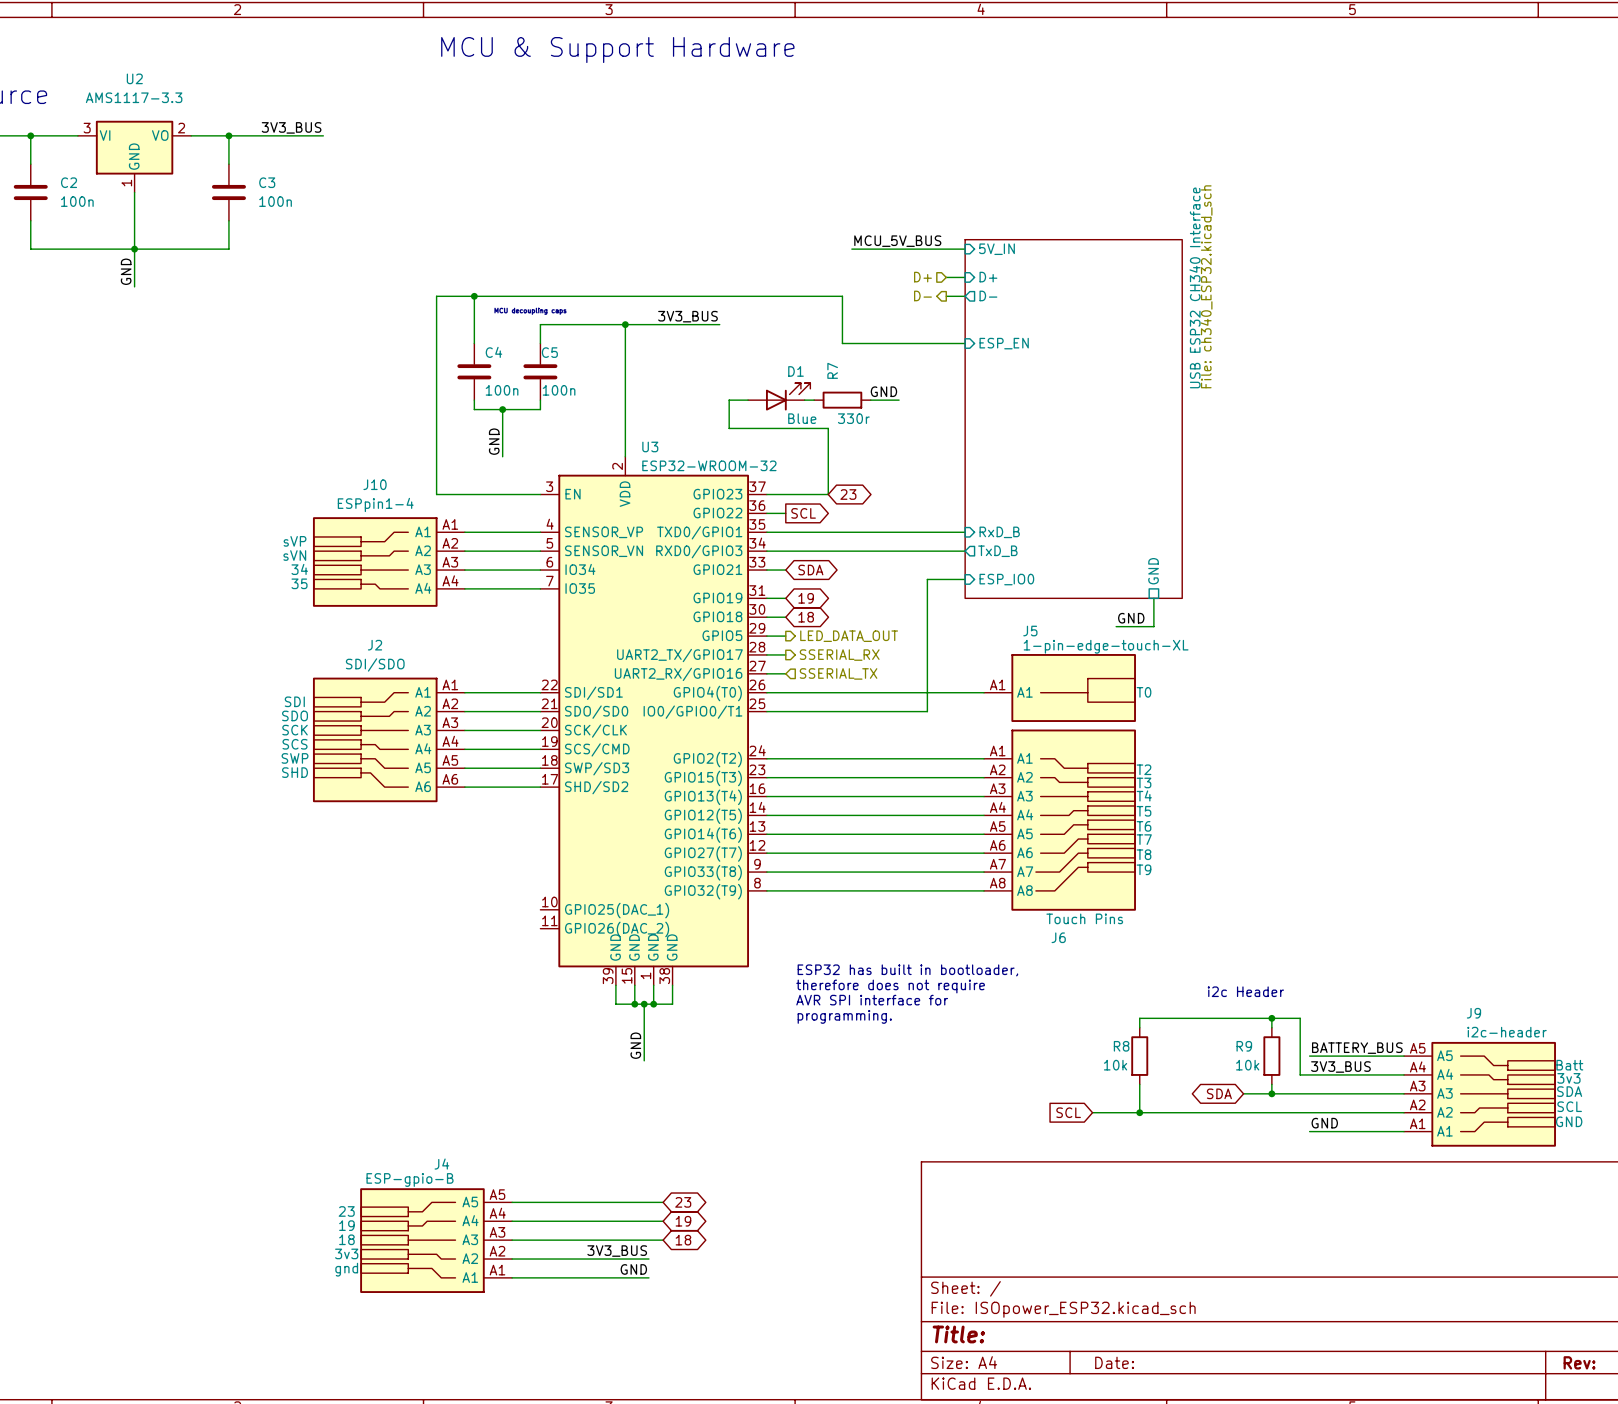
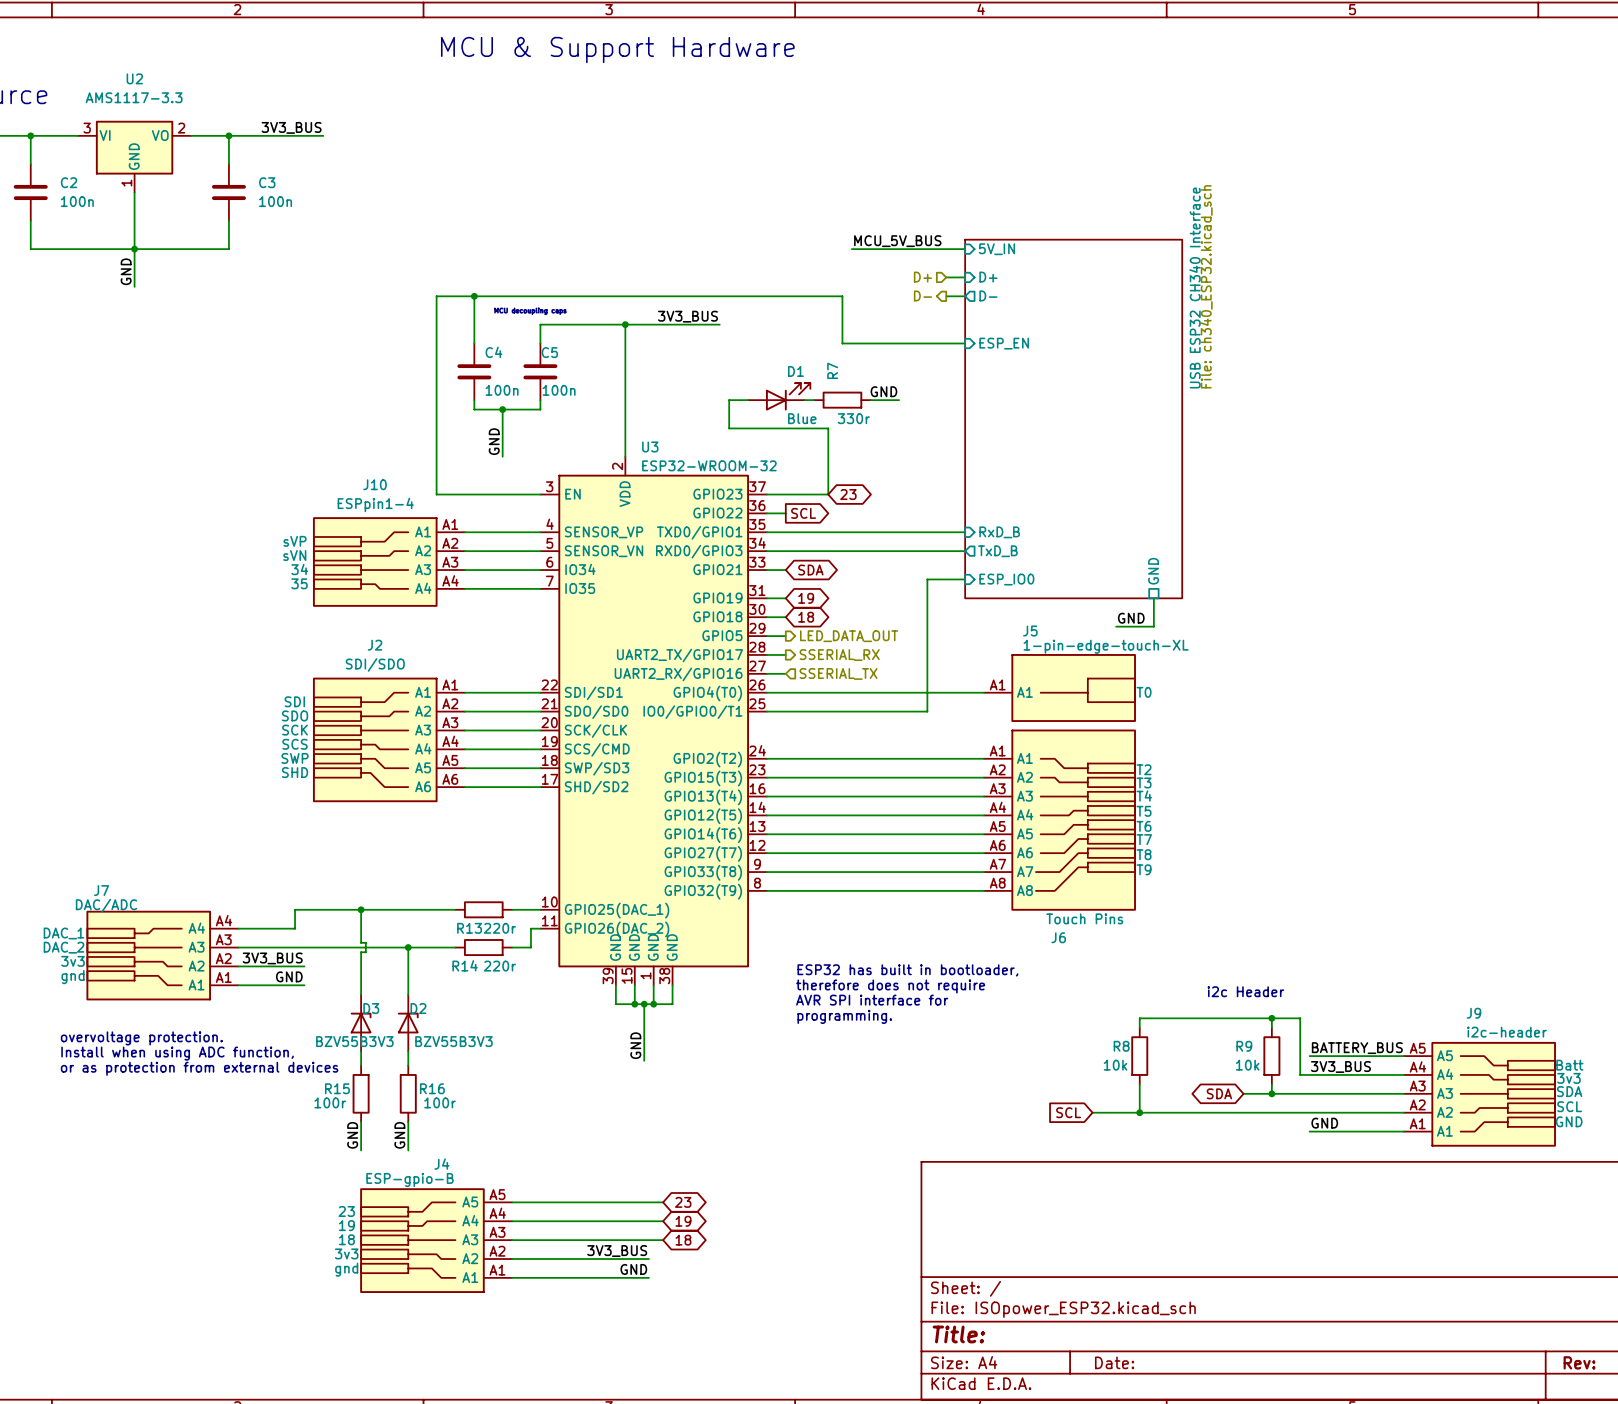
wire: none -> (361, 909) (361, 942) (365, 942) (365, 952) (361, 952) (361, 994)
junction: none -> (361, 909)
wire: none -> (455, 909) (295, 909) (295, 928) (238, 928)
R13: none -> 220r (483, 909)
wire: none -> (512, 909) (540, 909)
wire: none -> (540, 928) (530, 928) (530, 947) (512, 947)
wire: none -> (238, 947) (455, 947)
wire: none -> (408, 947) (408, 994)
junction: none -> (408, 947)
R14: none -> 220r (483, 947)
J7: none -> DAC/ADC (162, 955)
label: none -> 3V3_BUS (272, 958)
wire: none -> (238, 966) (304, 966)
label: none -> GND (289, 976)
wire: none -> (238, 985) (304, 985)
D3: none -> BZV55B3V3 (361, 1023)
D2: none -> BZV55B3V3 (408, 1023)
text: none -> overvoltage protection. (141, 1038)
wire: none -> (361, 1051) (361, 1065)
wire: none -> (408, 1051) (408, 1065)
text: none -> Install when using ADC function, (177, 1053)
text: none -> or as protection from external devices (199, 1068)
R15: none -> 100r (361, 1093)
R16: none -> 100r (408, 1093)
wire: none -> (361, 1122) (361, 1150)
wire: none -> (408, 1122) (408, 1150)
label: none -> GND (352, 1135)
label: none -> GND (399, 1135)

